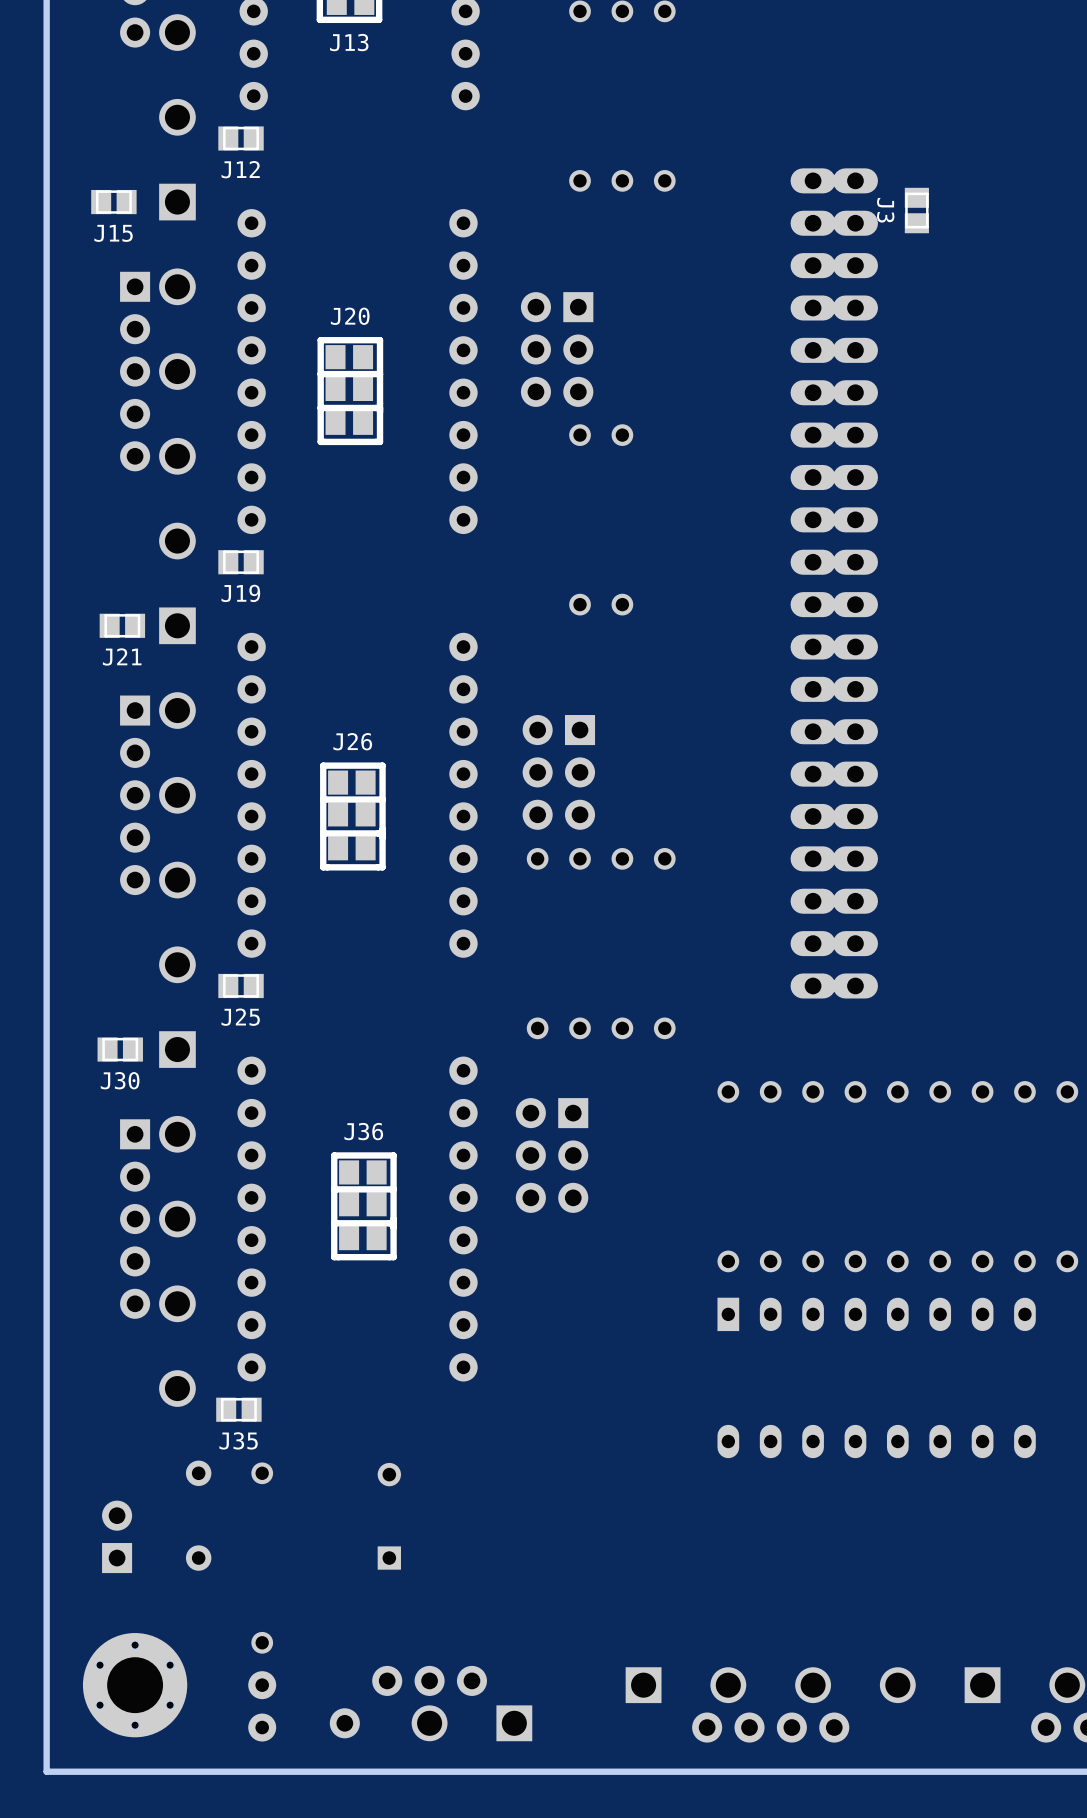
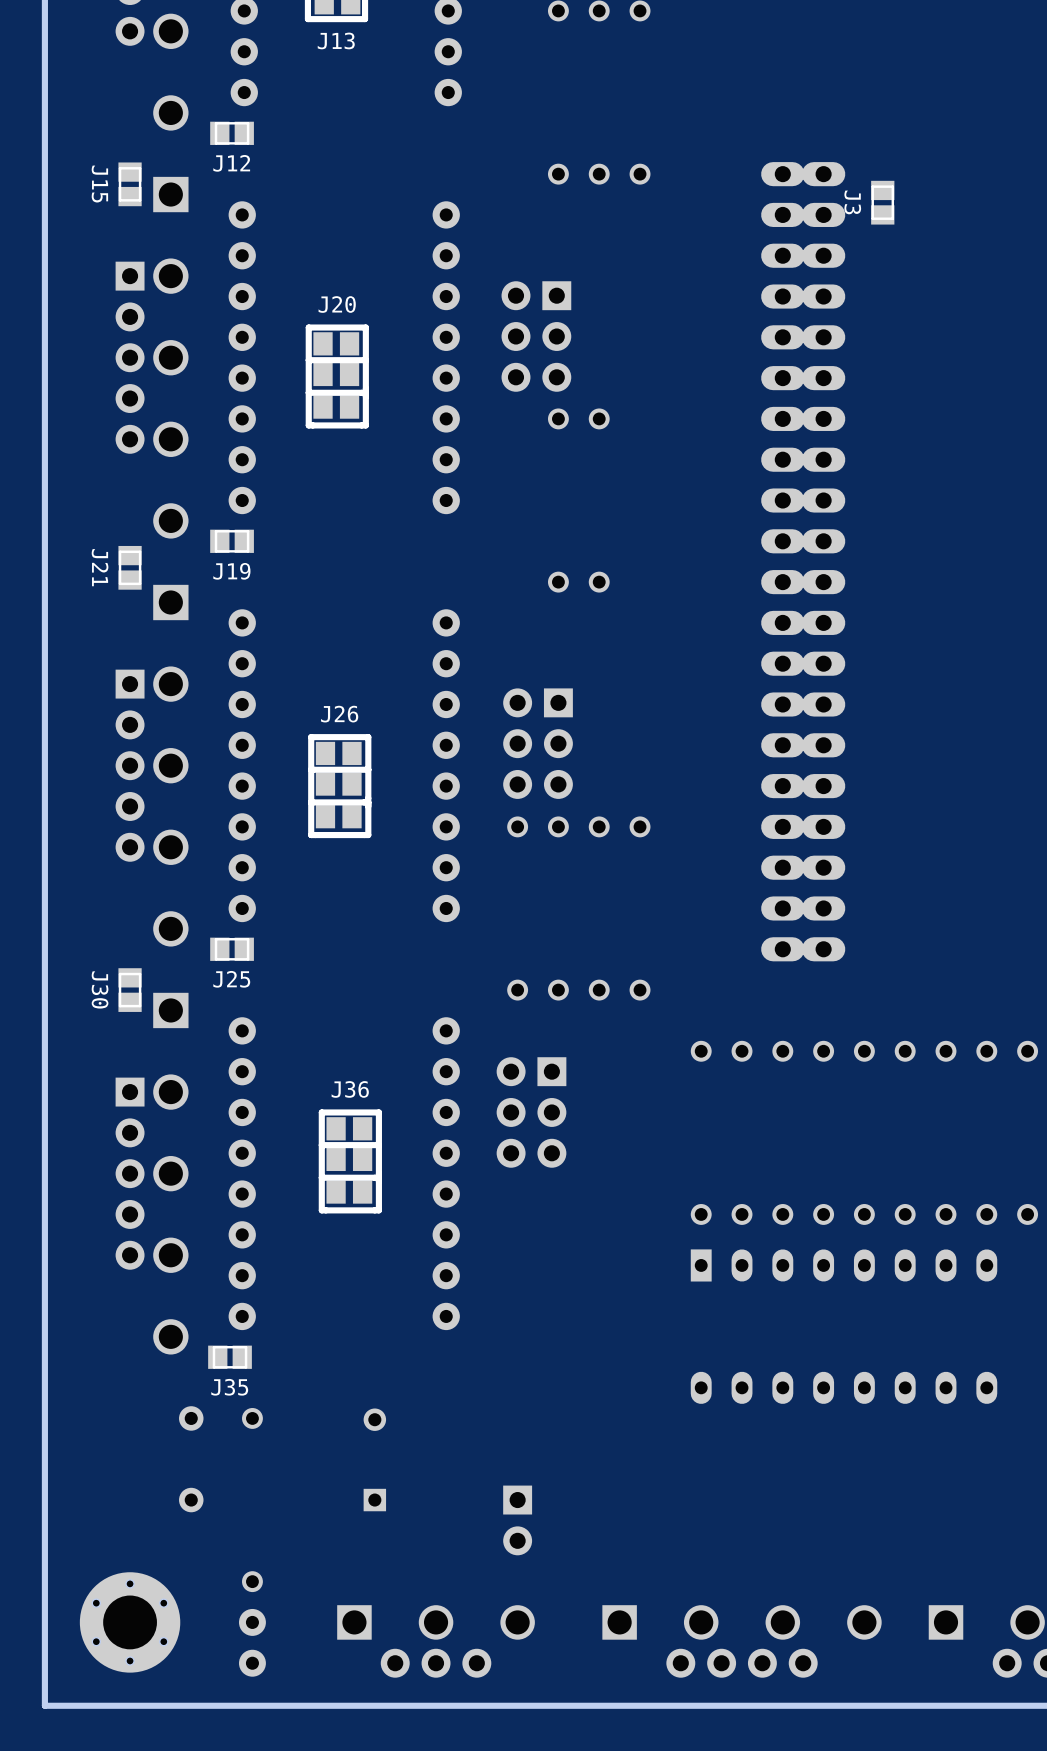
J15 rotation: 0° (113, 202) -> 90° clockwise (130, 184)
J21 rotation: 0° (122, 625) -> 90° clockwise (130, 567)
J21 position: (122, 625) -> (130, 567)
J30 rotation: 0° (120, 1049) -> 90° clockwise (130, 990)
part: (117, 1536) -> none
part: none -> (517, 1520)
part: (431, 1703) -> none
part: none -> (436, 1641)

